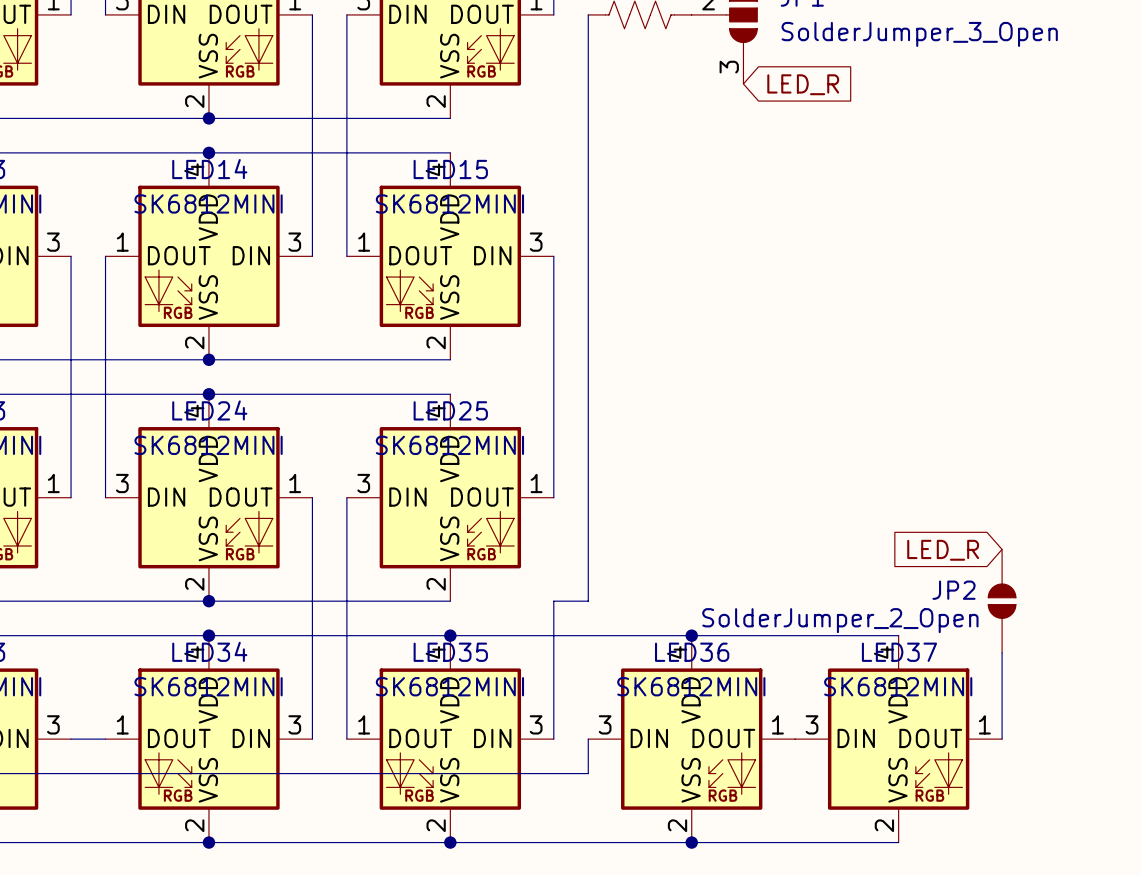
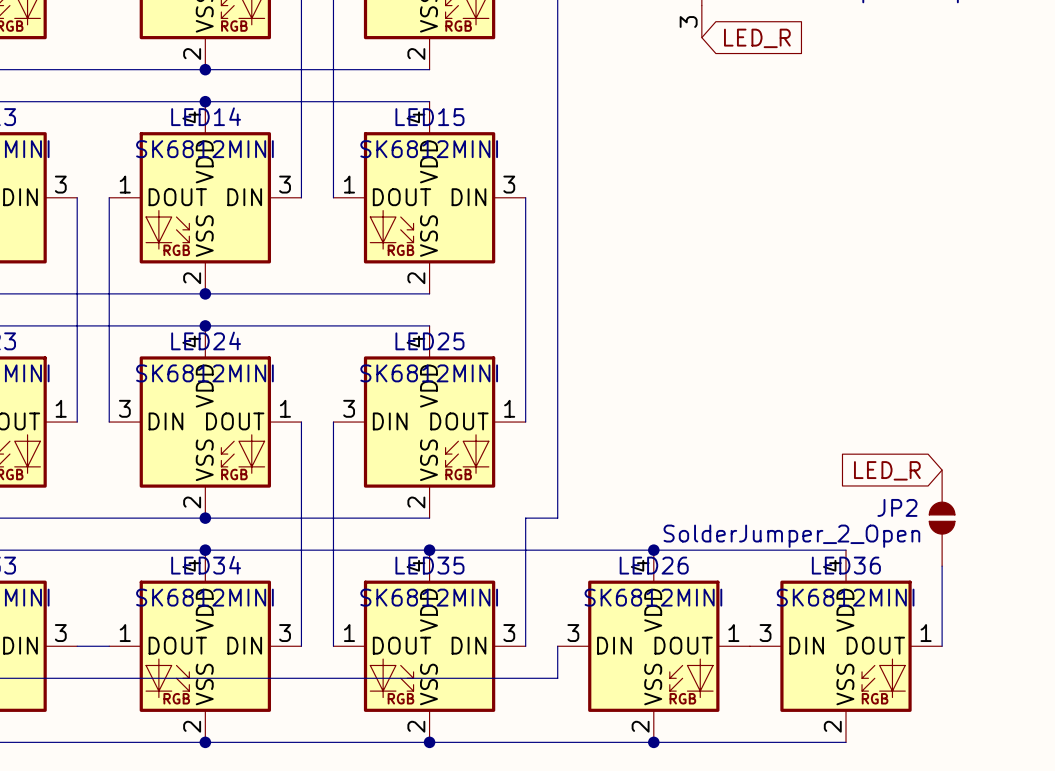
LED36 name: LED36 (692, 652) -> LED26 (654, 565)
LED37 name: LED37 (899, 652) -> LED36 (846, 565)

